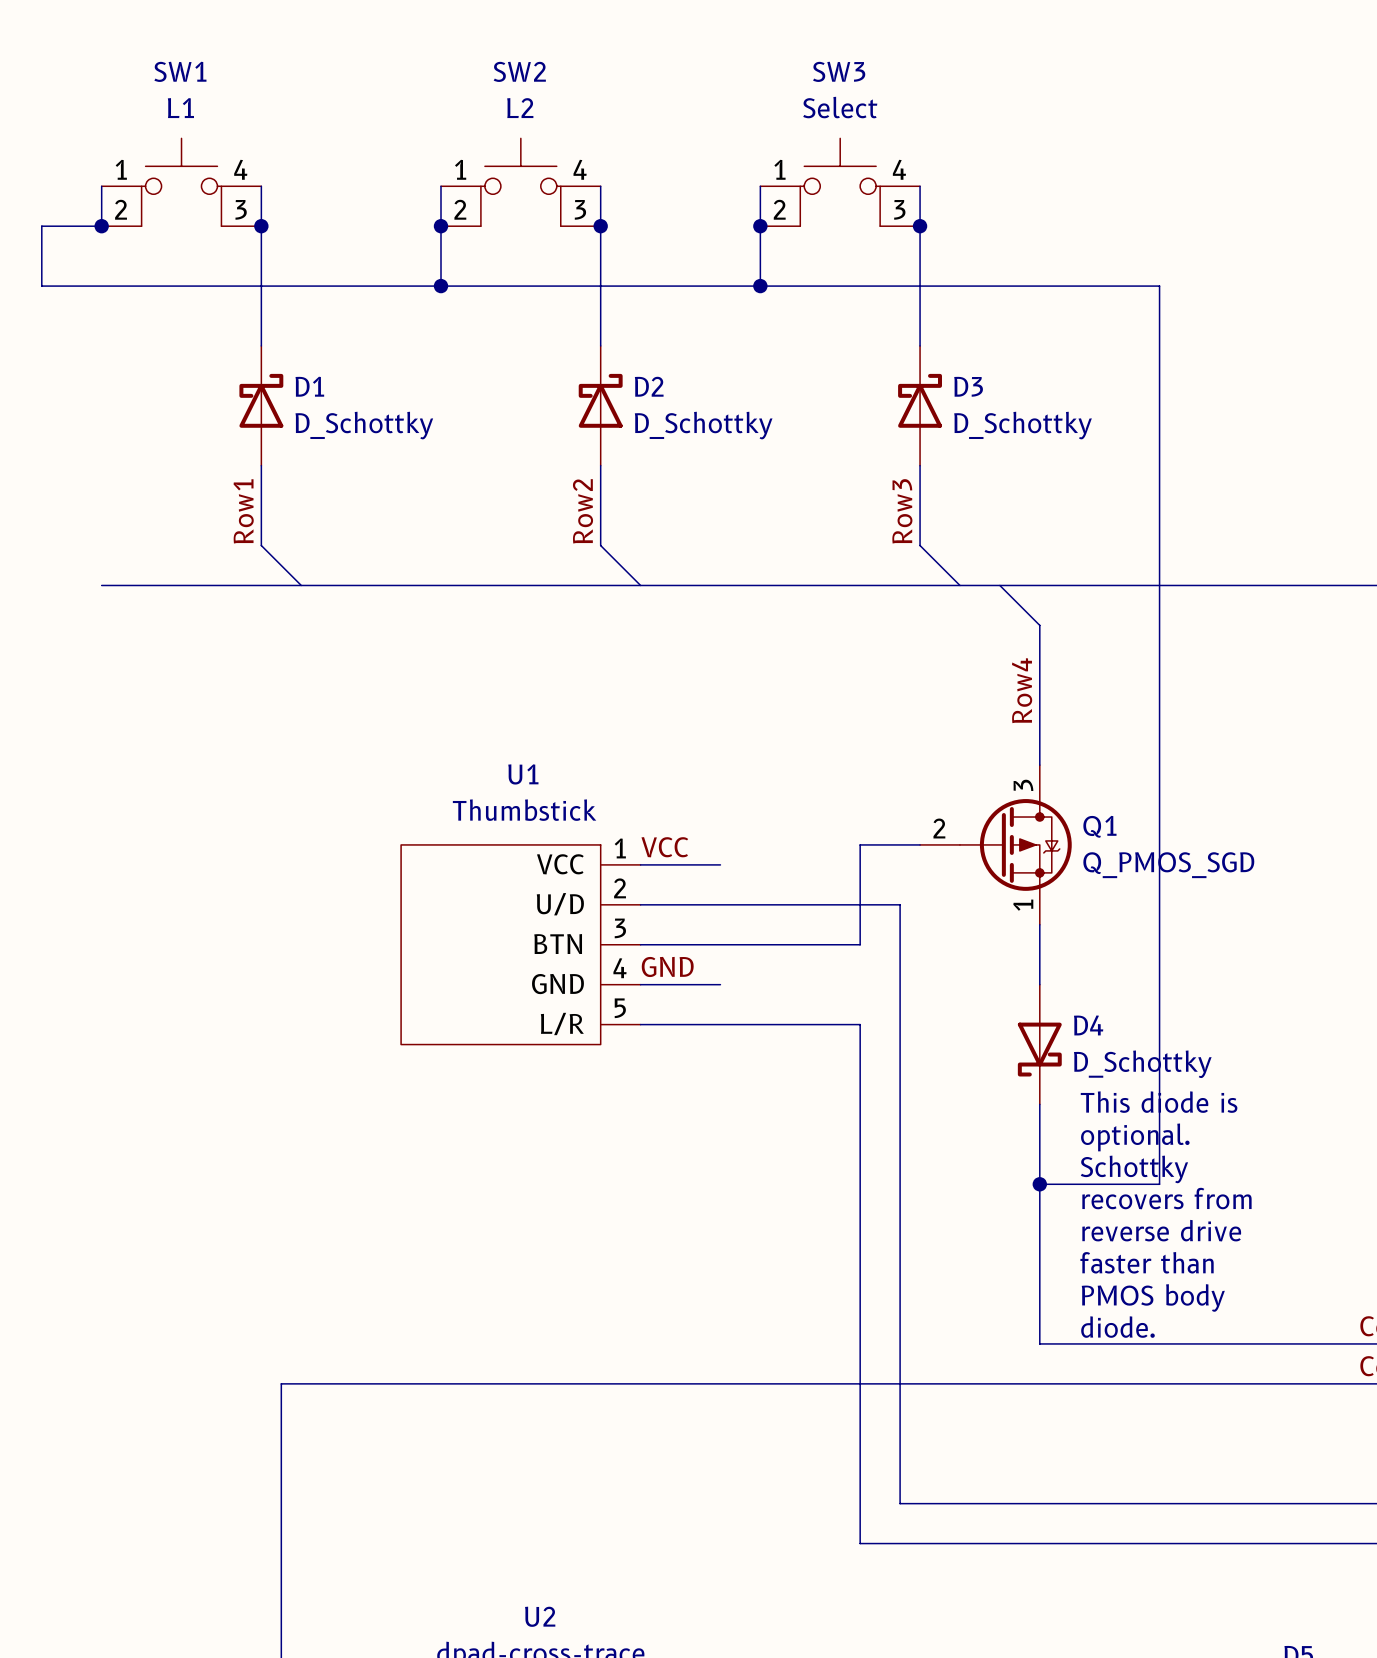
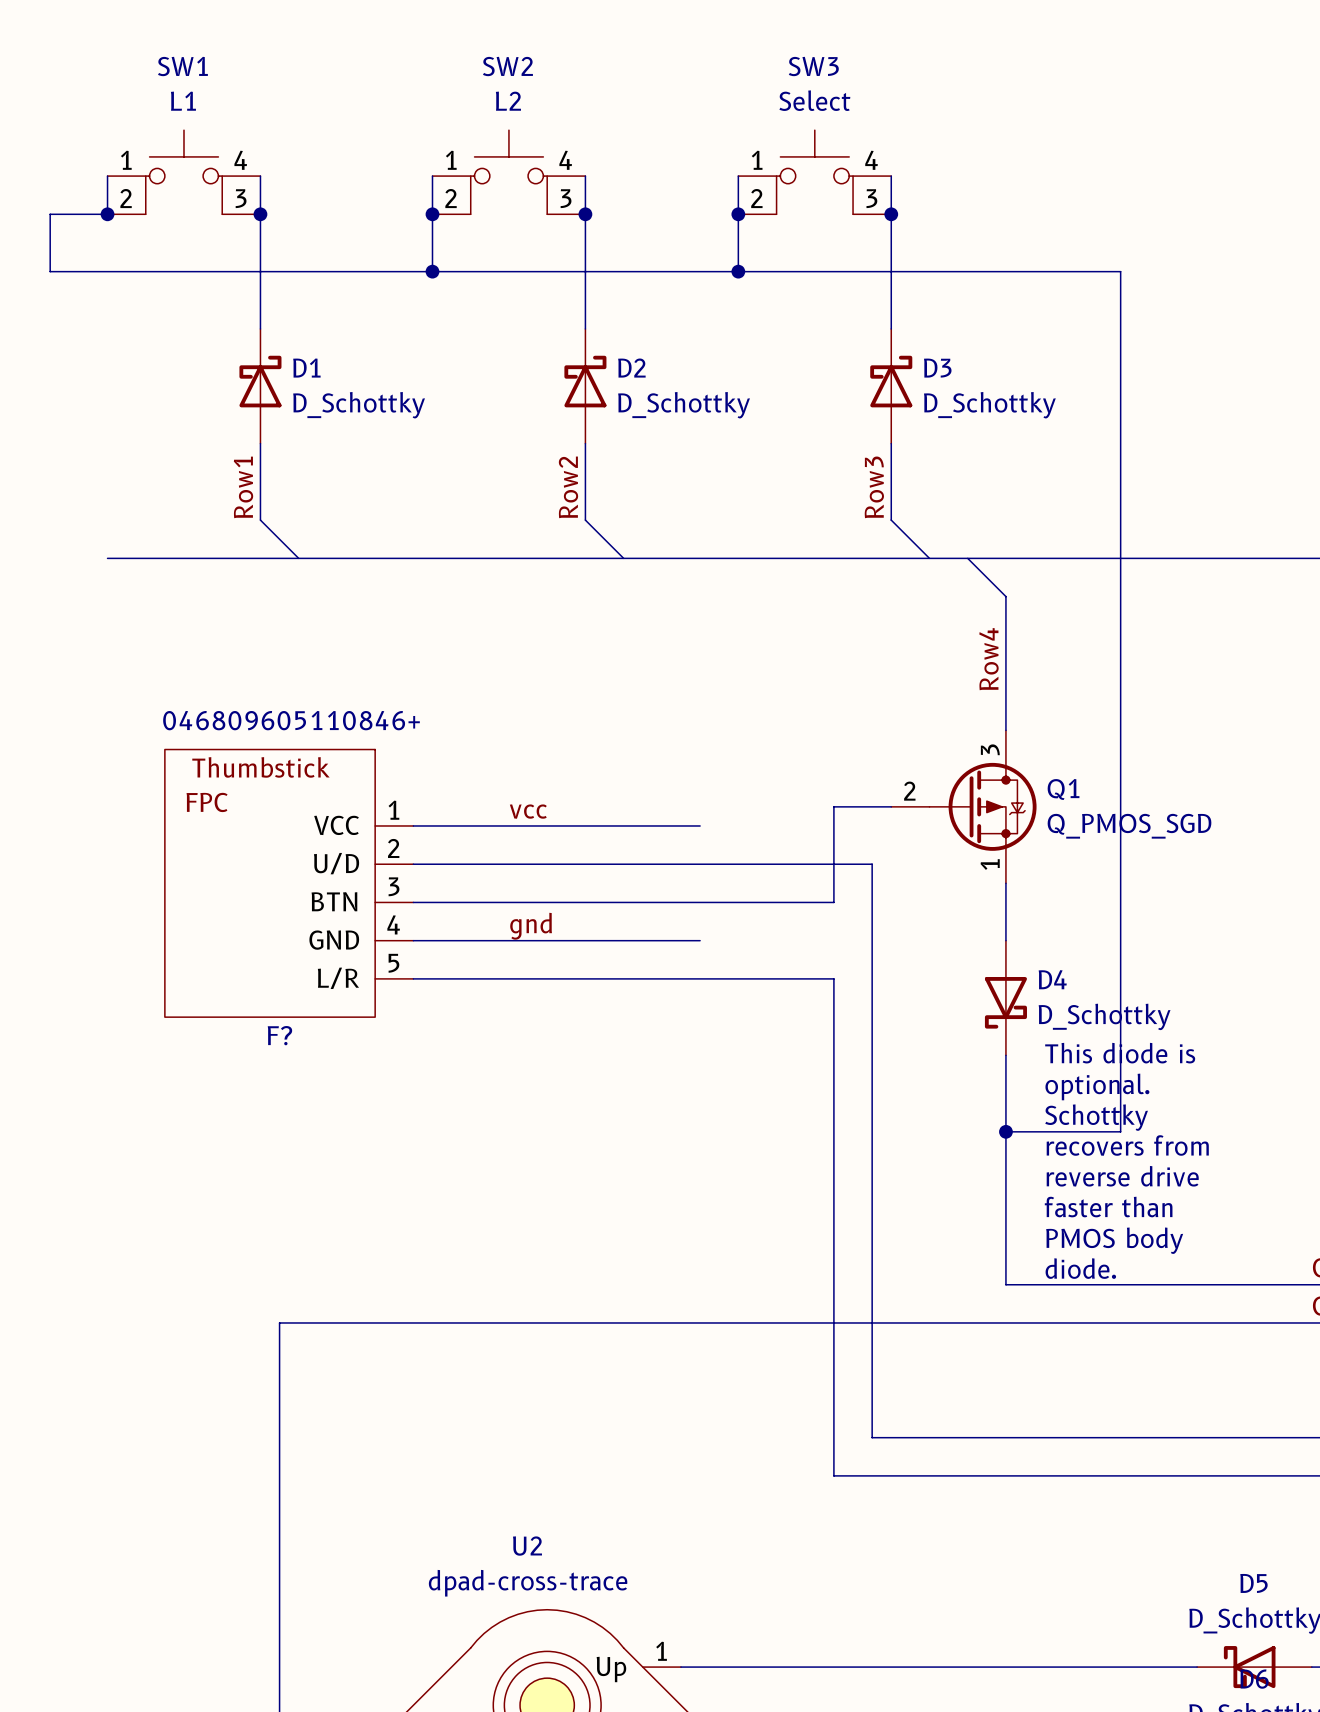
label: VCC (664, 847) -> none
label: none -> vcc (528, 811)
wire: none -> (413, 825) (623, 825)
wire: none -> (413, 864) (623, 864)
F?: none -> 046809605110846+ (289, 883)
wire: none -> (413, 902) (623, 902)
U1: Thumbstick (520, 944) -> none
label: GND (667, 966) -> none
label: none -> gnd (531, 926)
wire: none -> (413, 940) (623, 940)
wire: none -> (413, 978) (623, 978)

